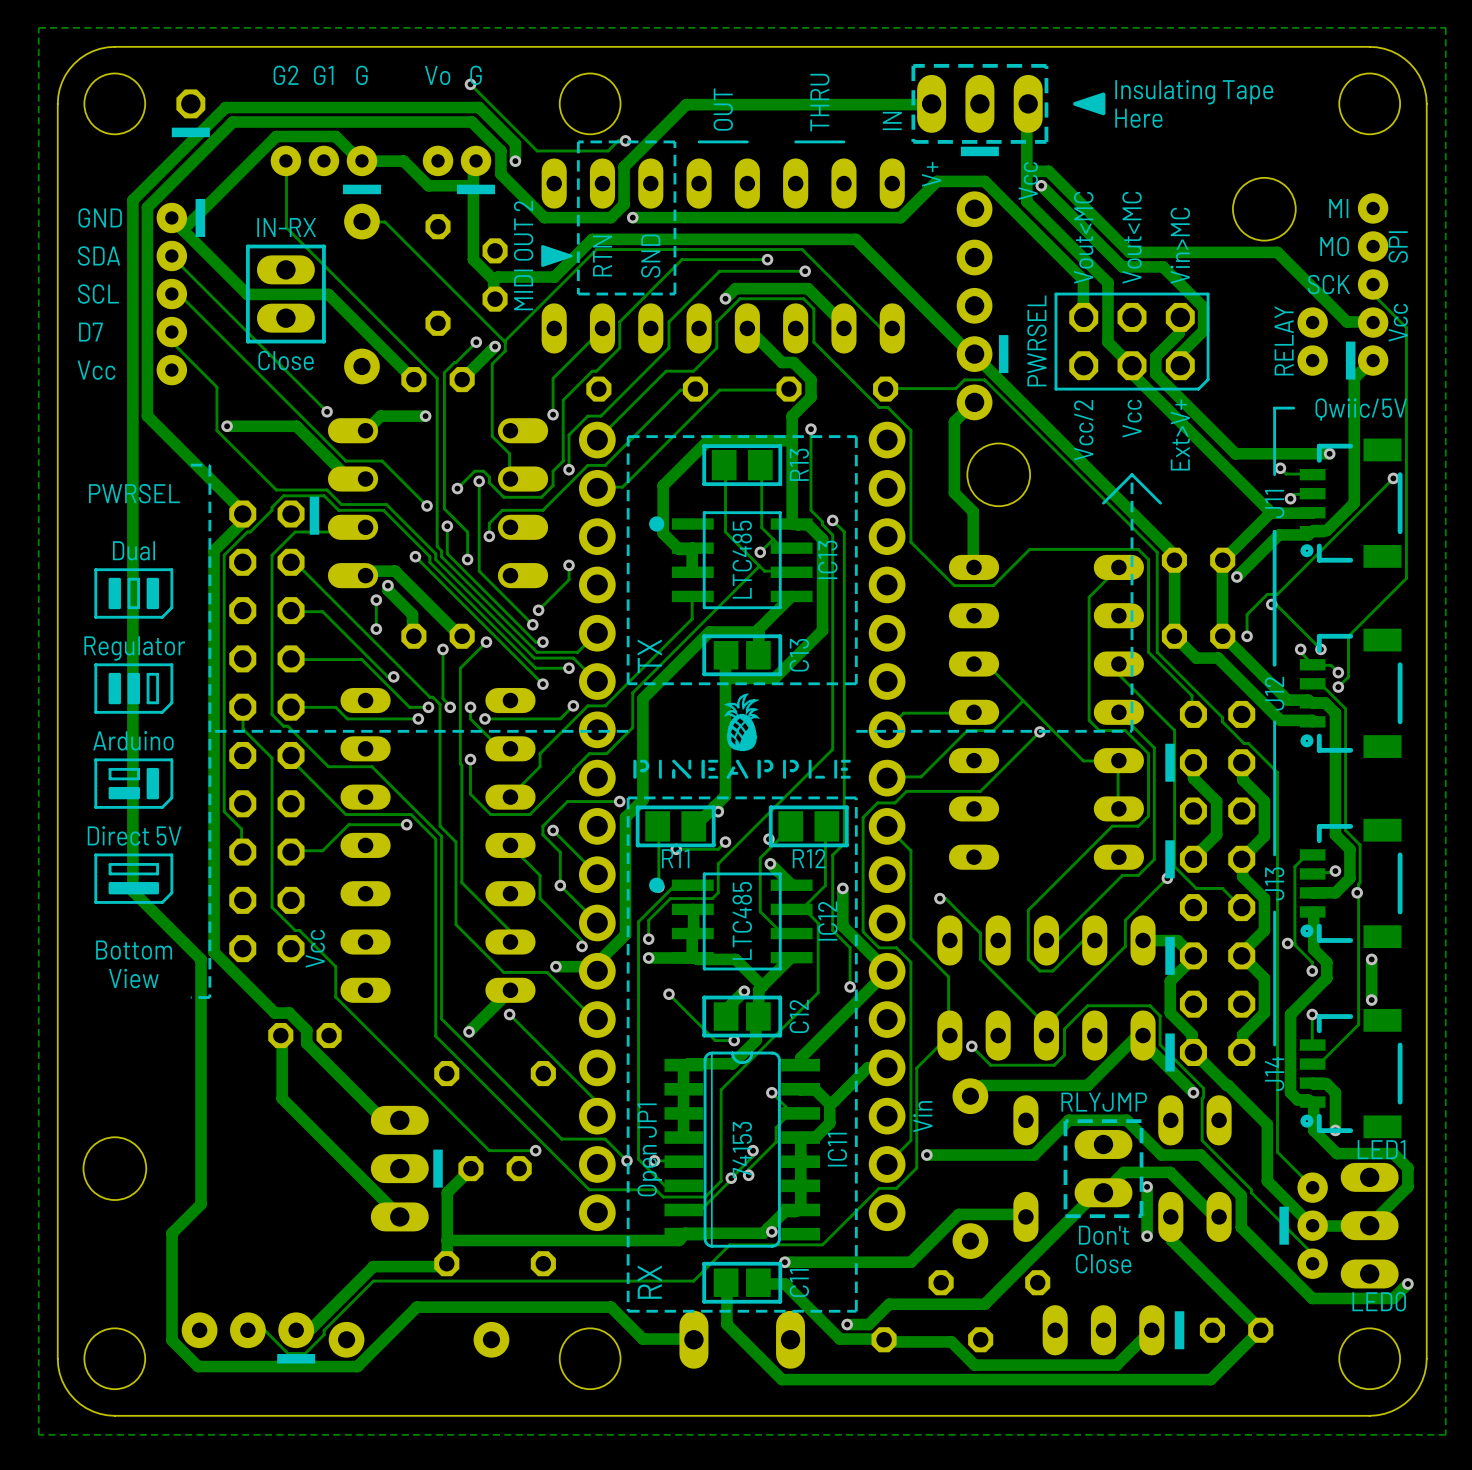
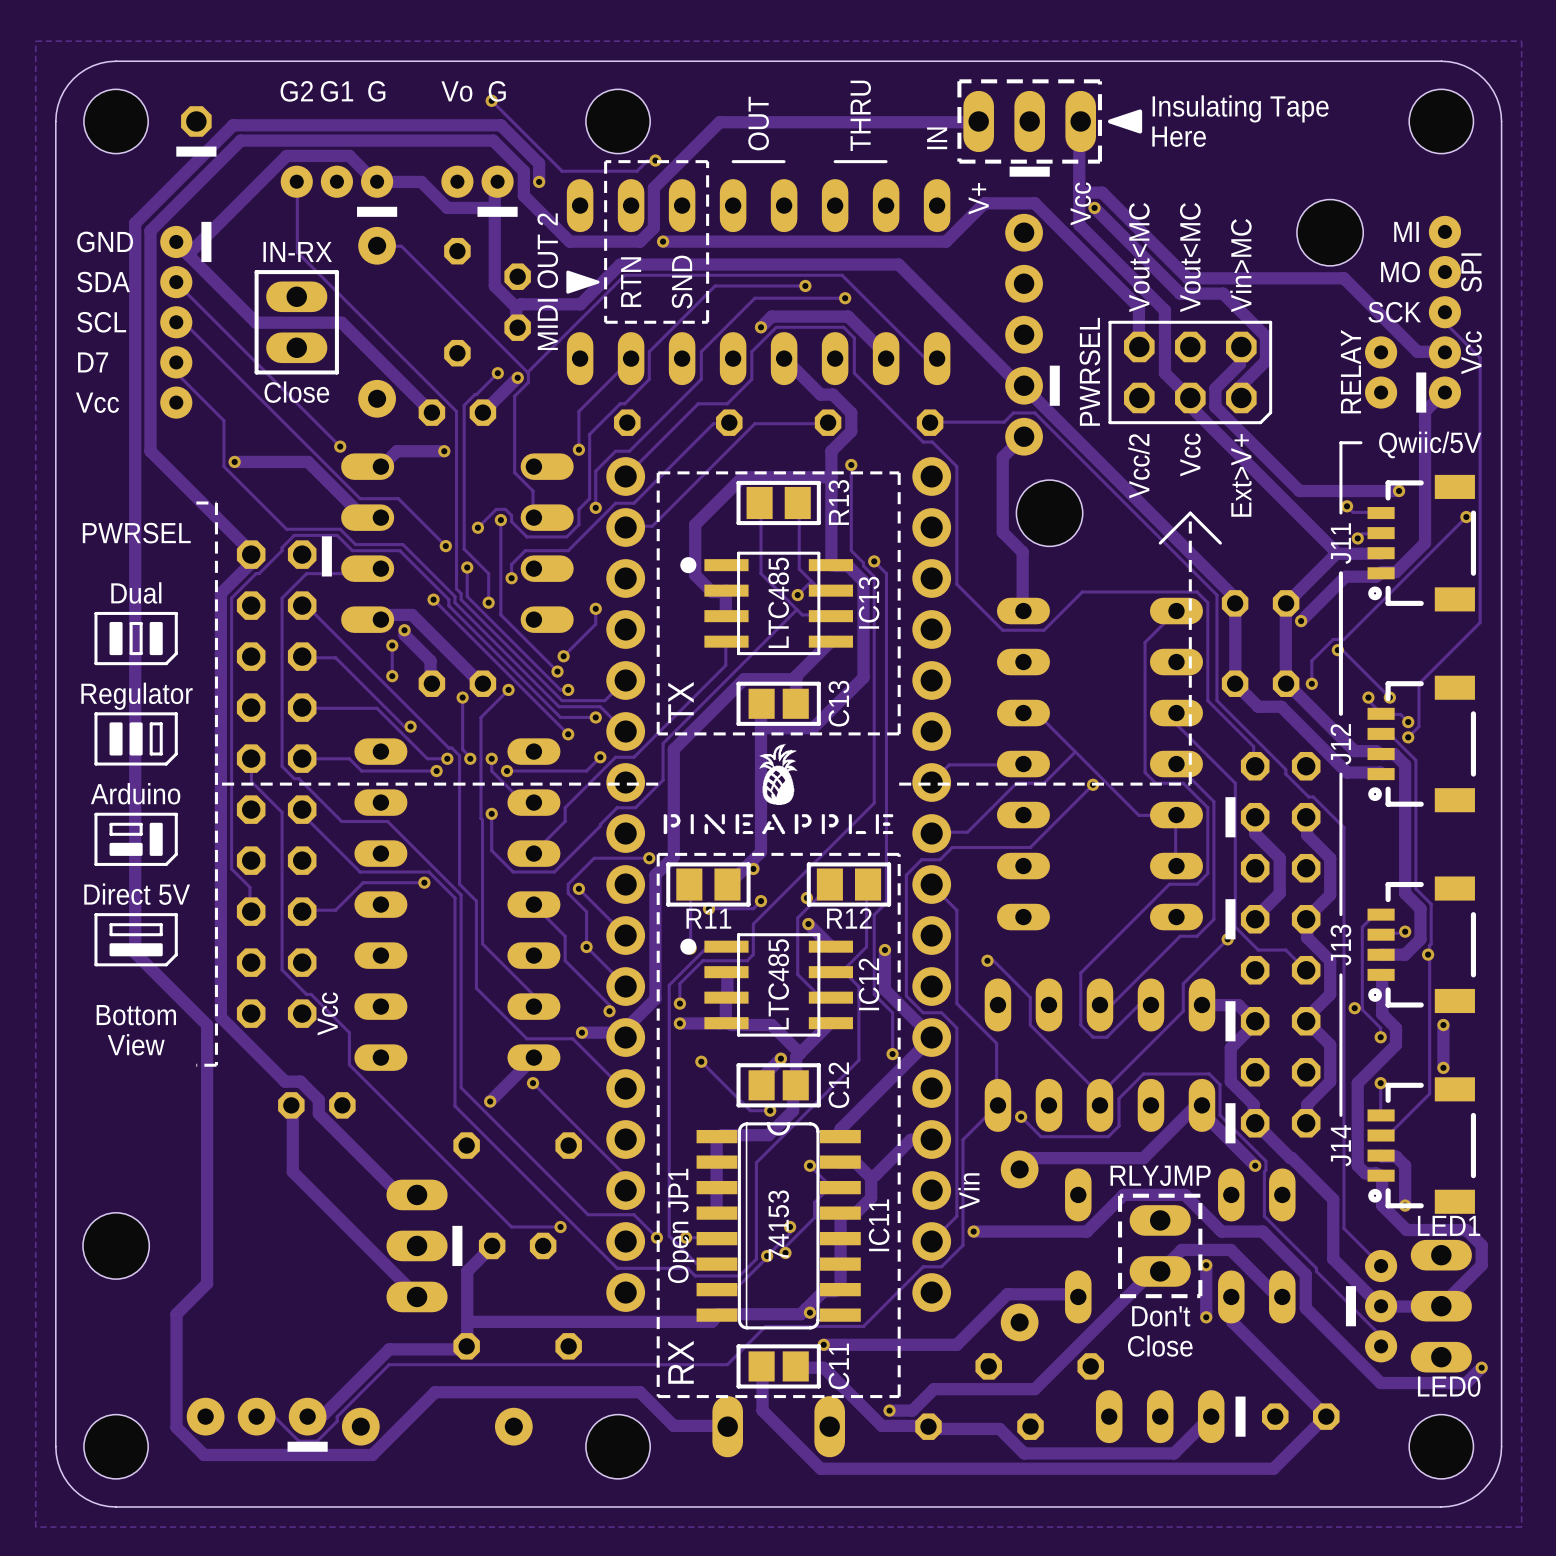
text position: Insulating Tape (1194, 92) -> Insulating Tape (1240, 108)
drawing position: (1089, 103) -> (1125, 121)
text position: Here (1138, 118) -> Here (1179, 136)

